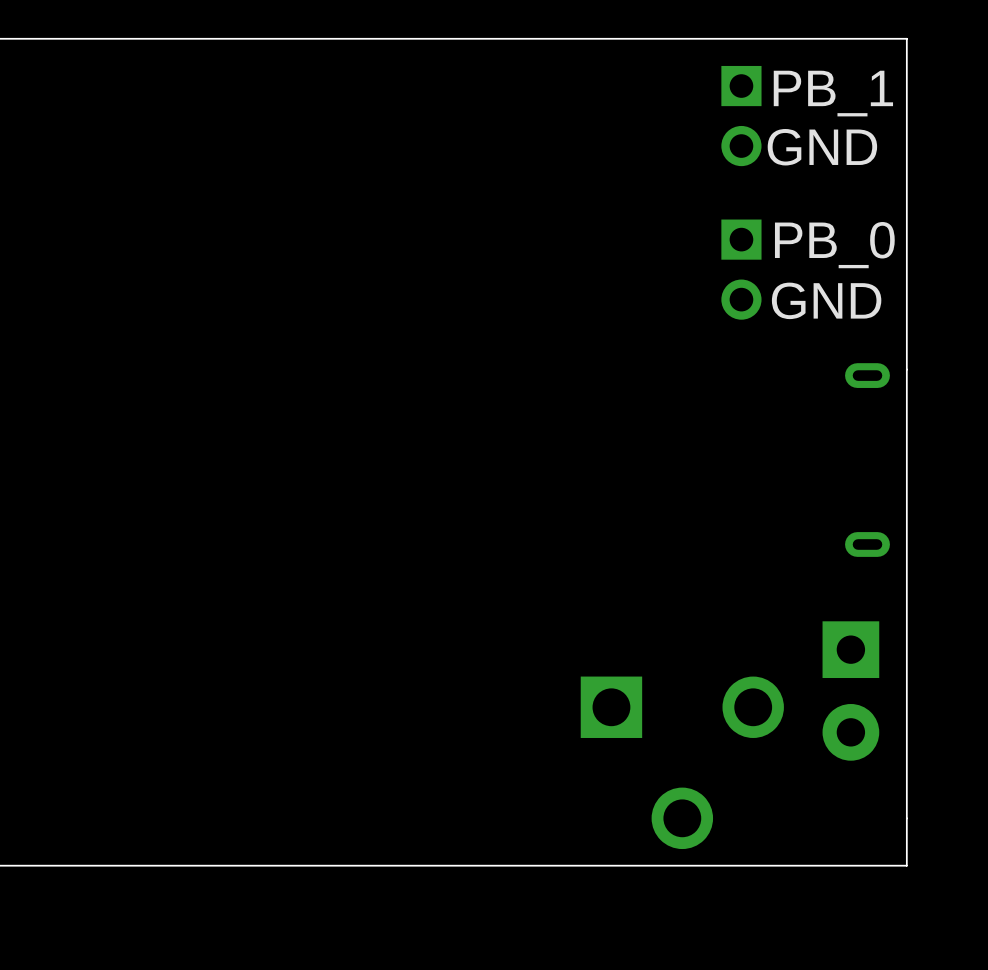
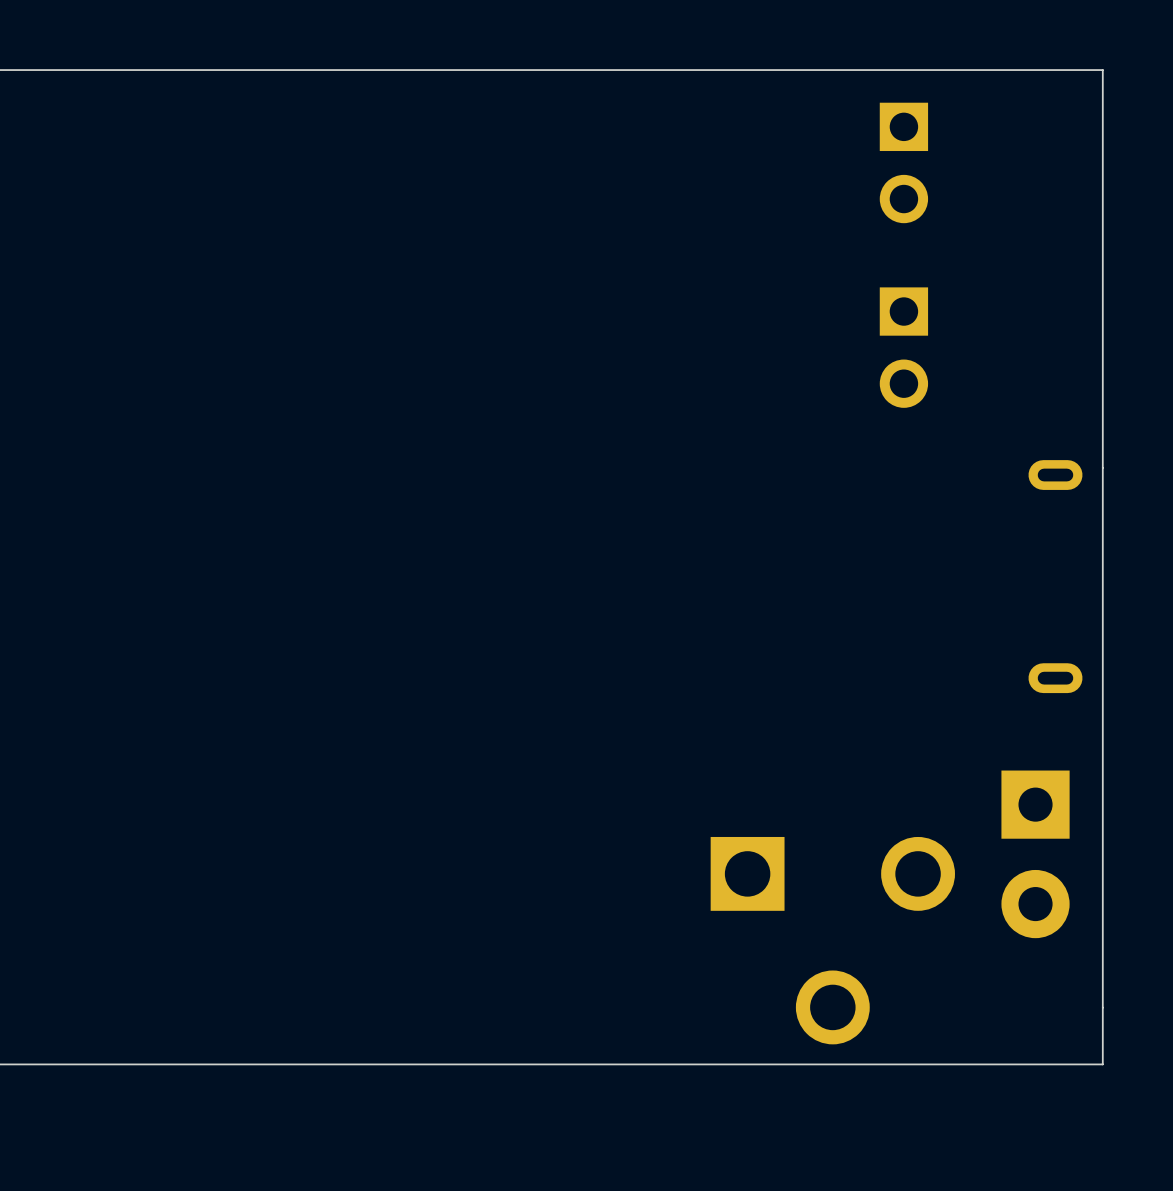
text: PB_1 (833, 93) -> none
text: GND (822, 147) -> none
text: PB_0 (834, 245) -> none
text: GND (826, 300) -> none

